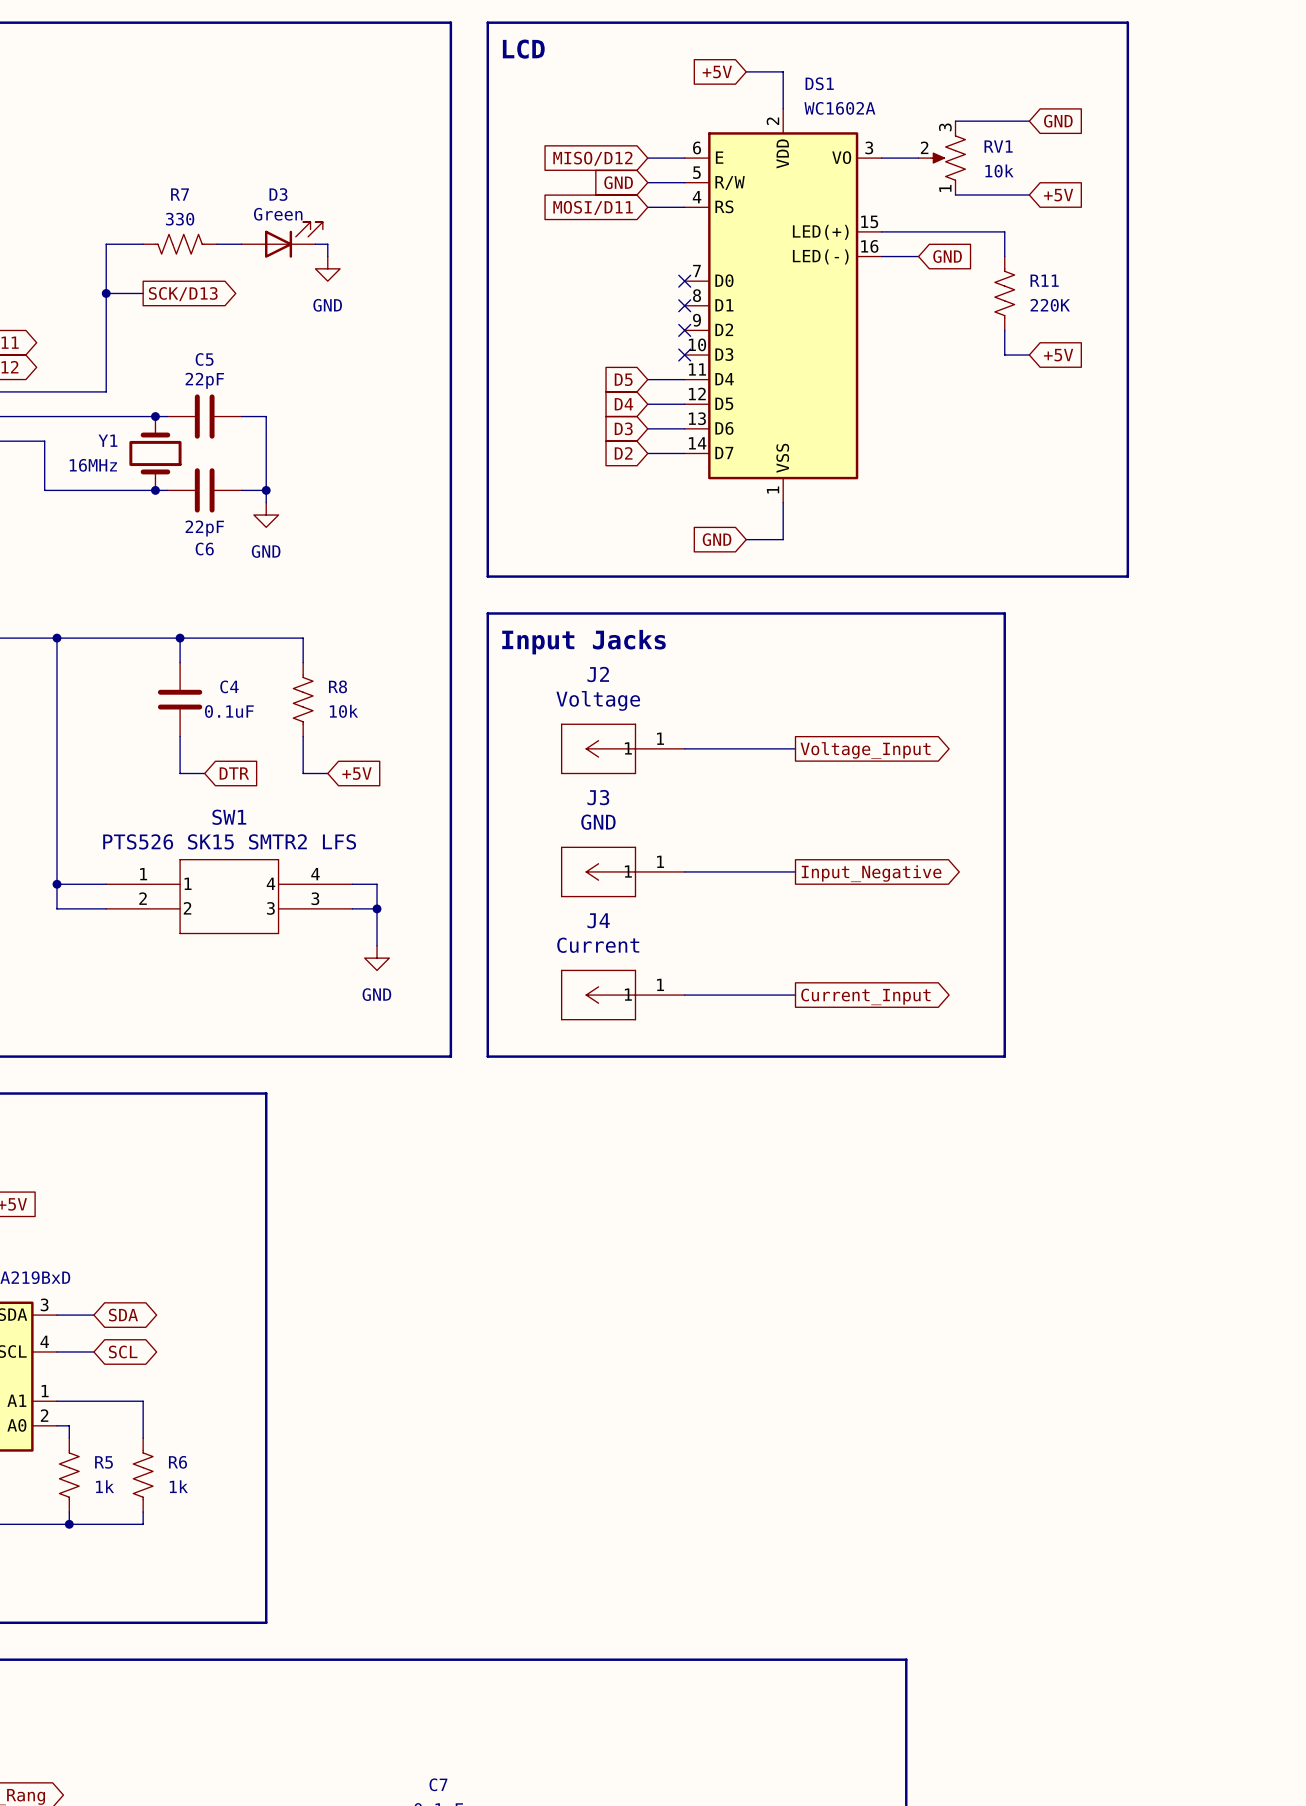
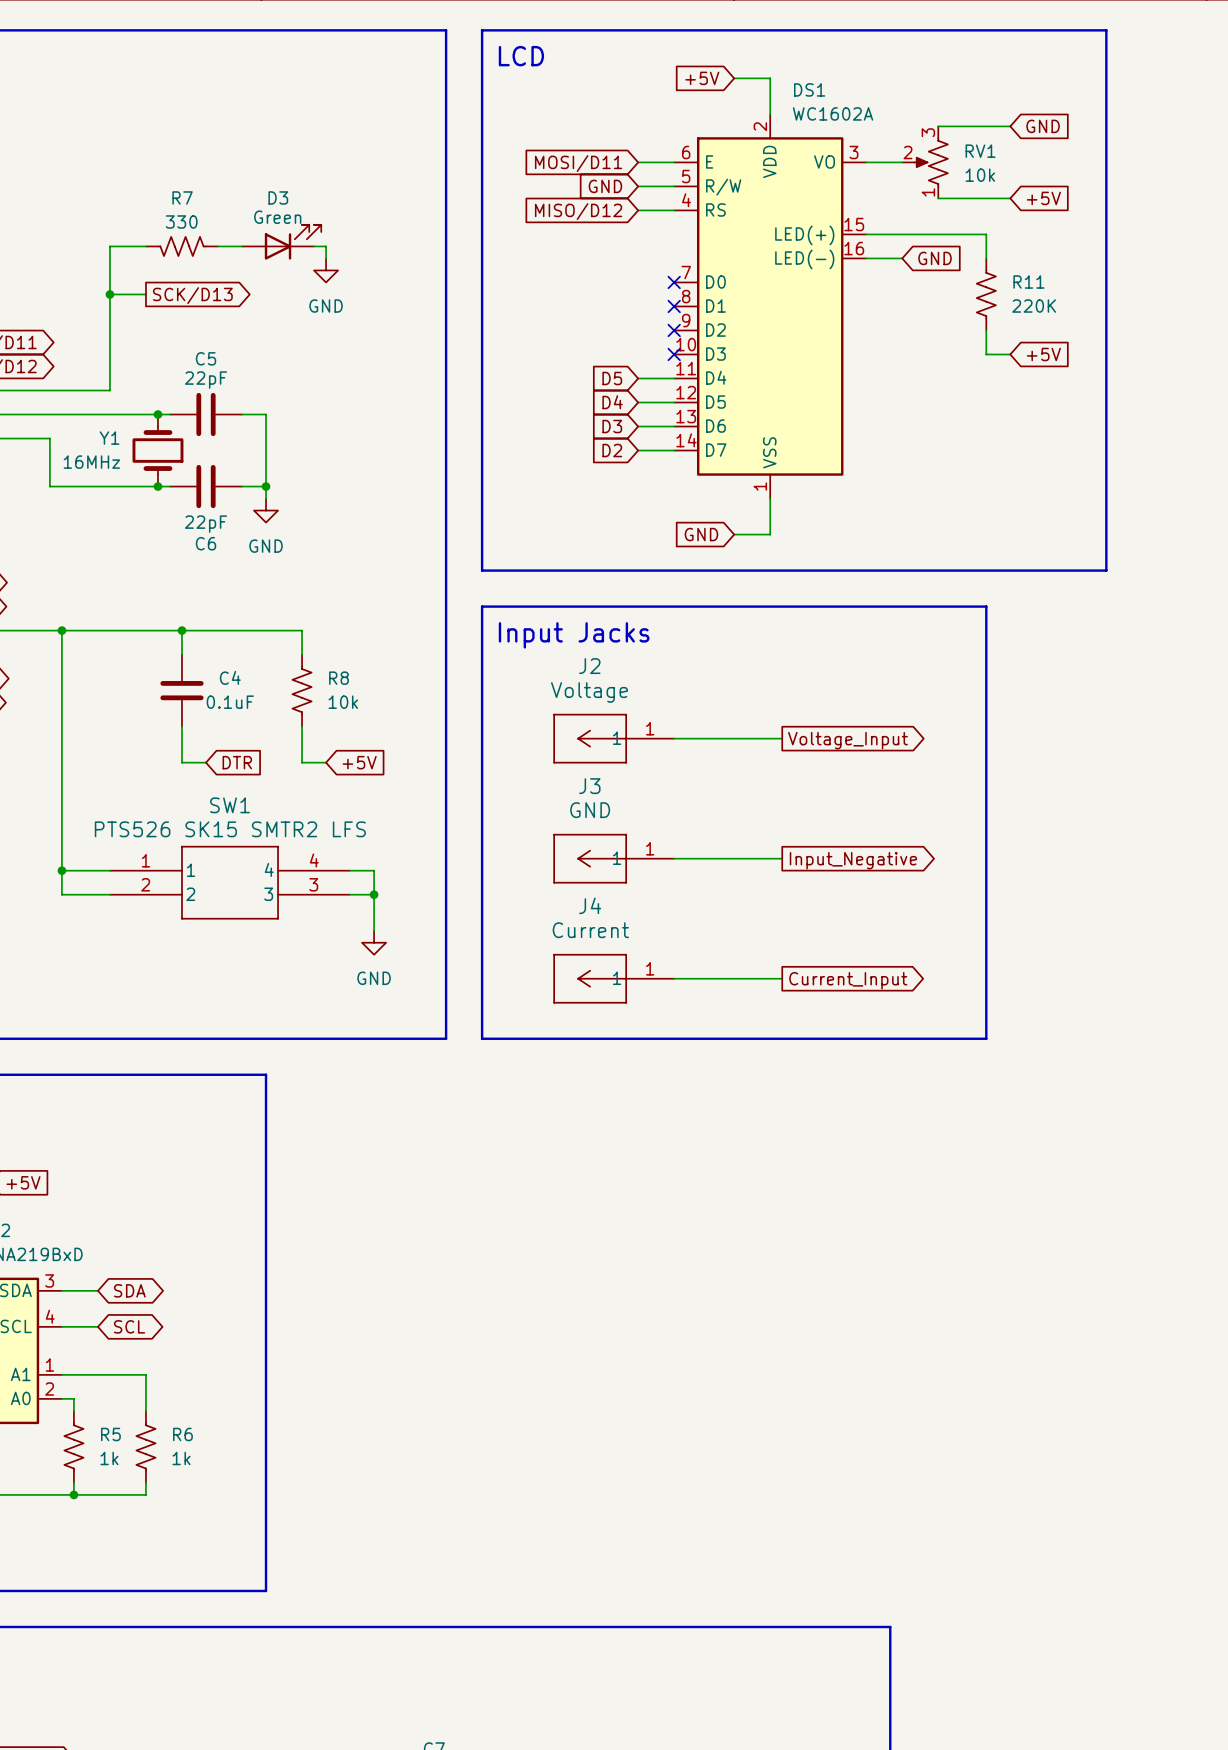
global label: MISO/D12 (592, 158) -> MOSI/D11 (578, 163)
global label: MOSI/D11 (593, 207) -> MISO/D12 (578, 211)

